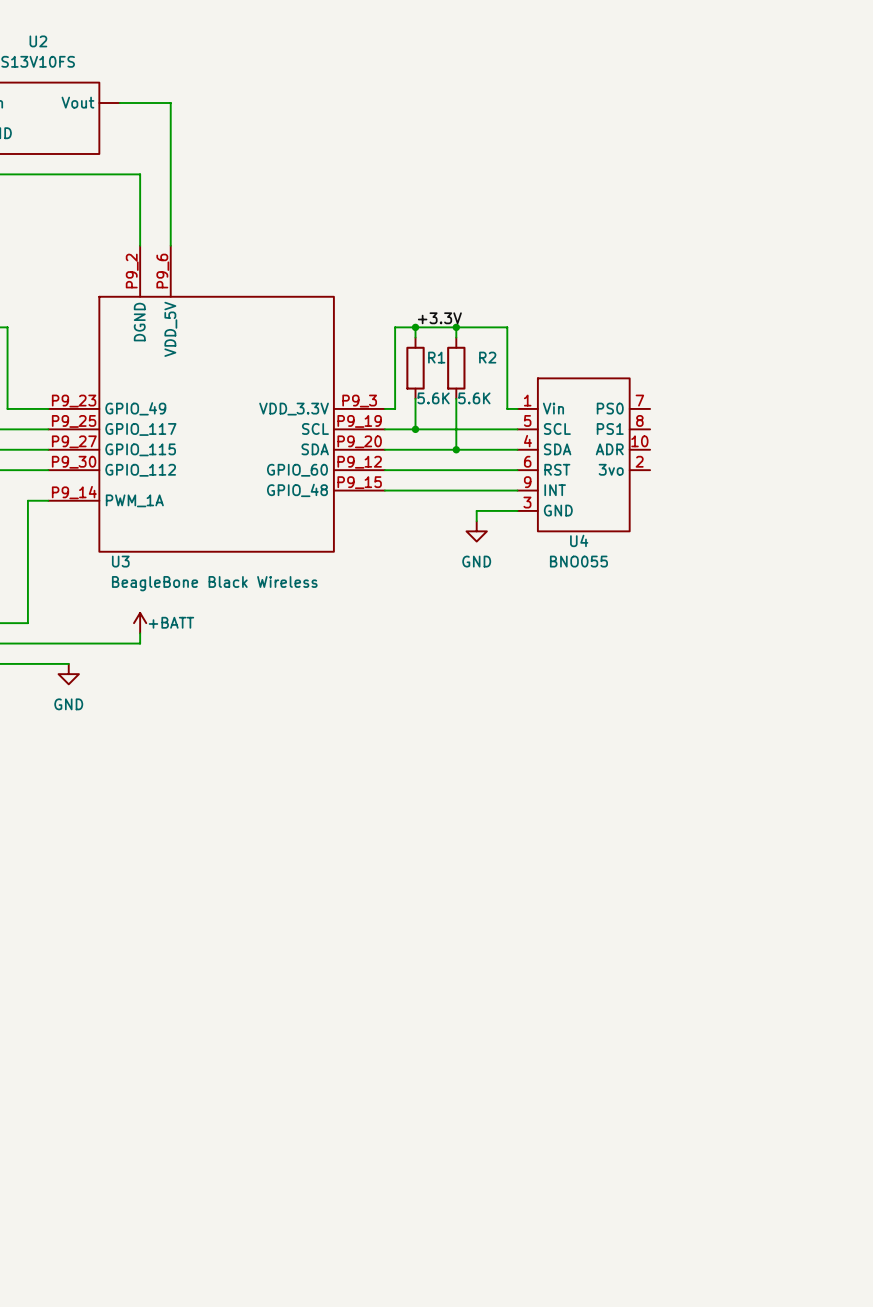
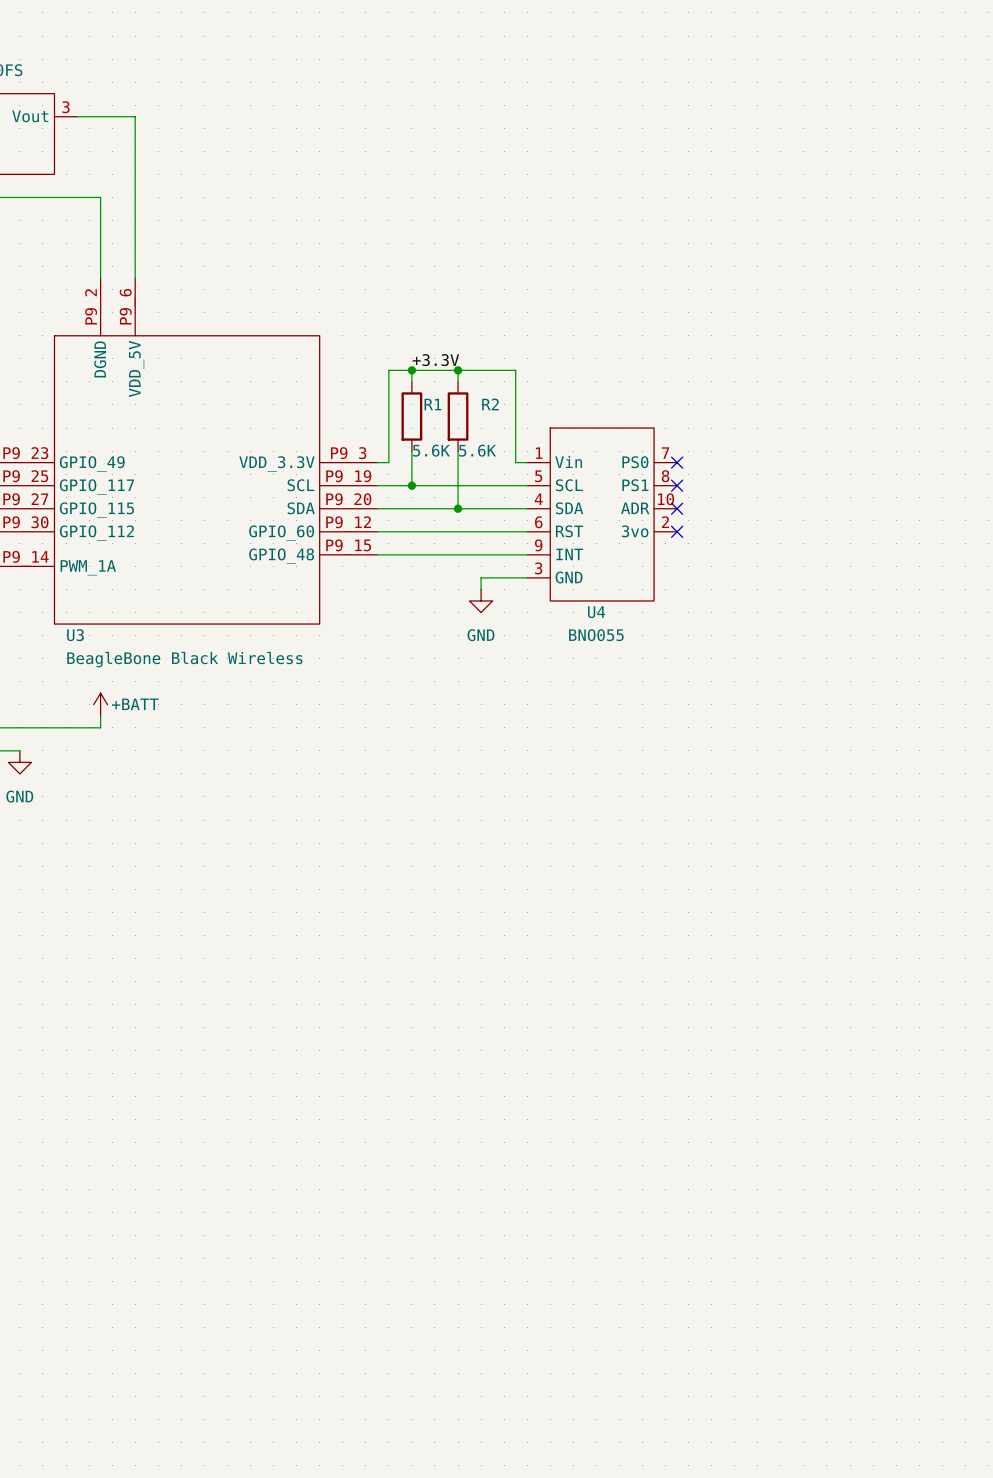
U2 pin number: none -> 3 (65, 107)
no-connect mark: none -> (677, 462)
no-connect mark: none -> (677, 485)
no-connect mark: none -> (677, 508)
no-connect mark: none -> (677, 531)

